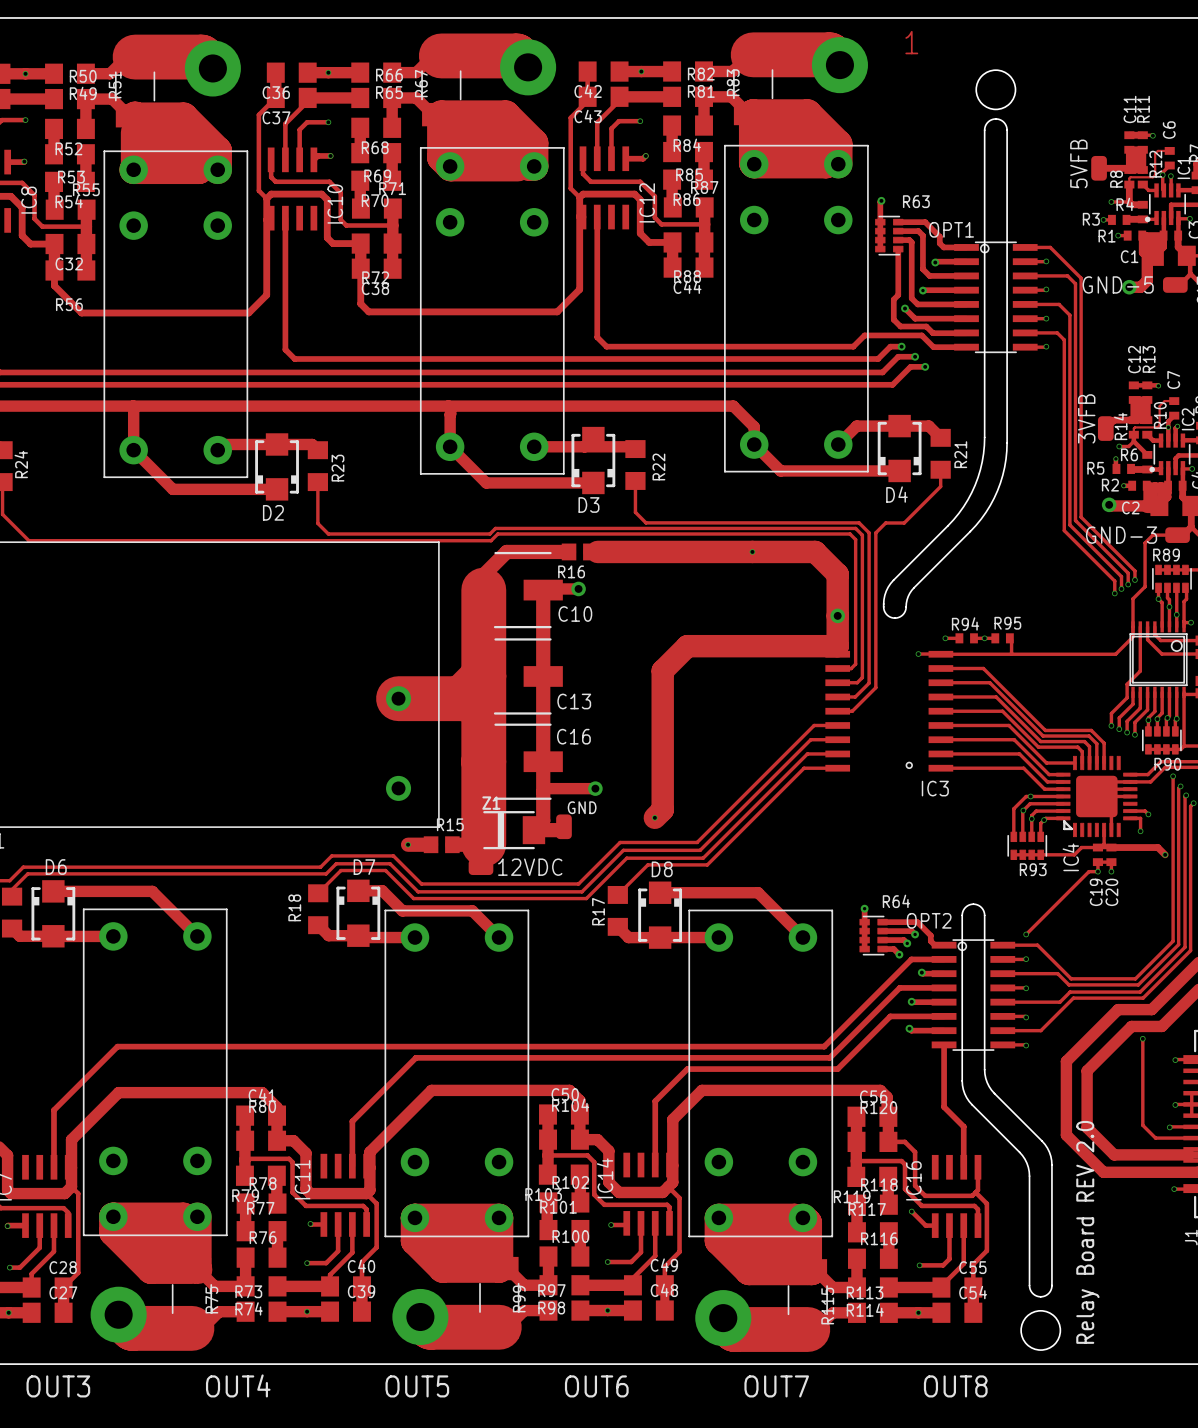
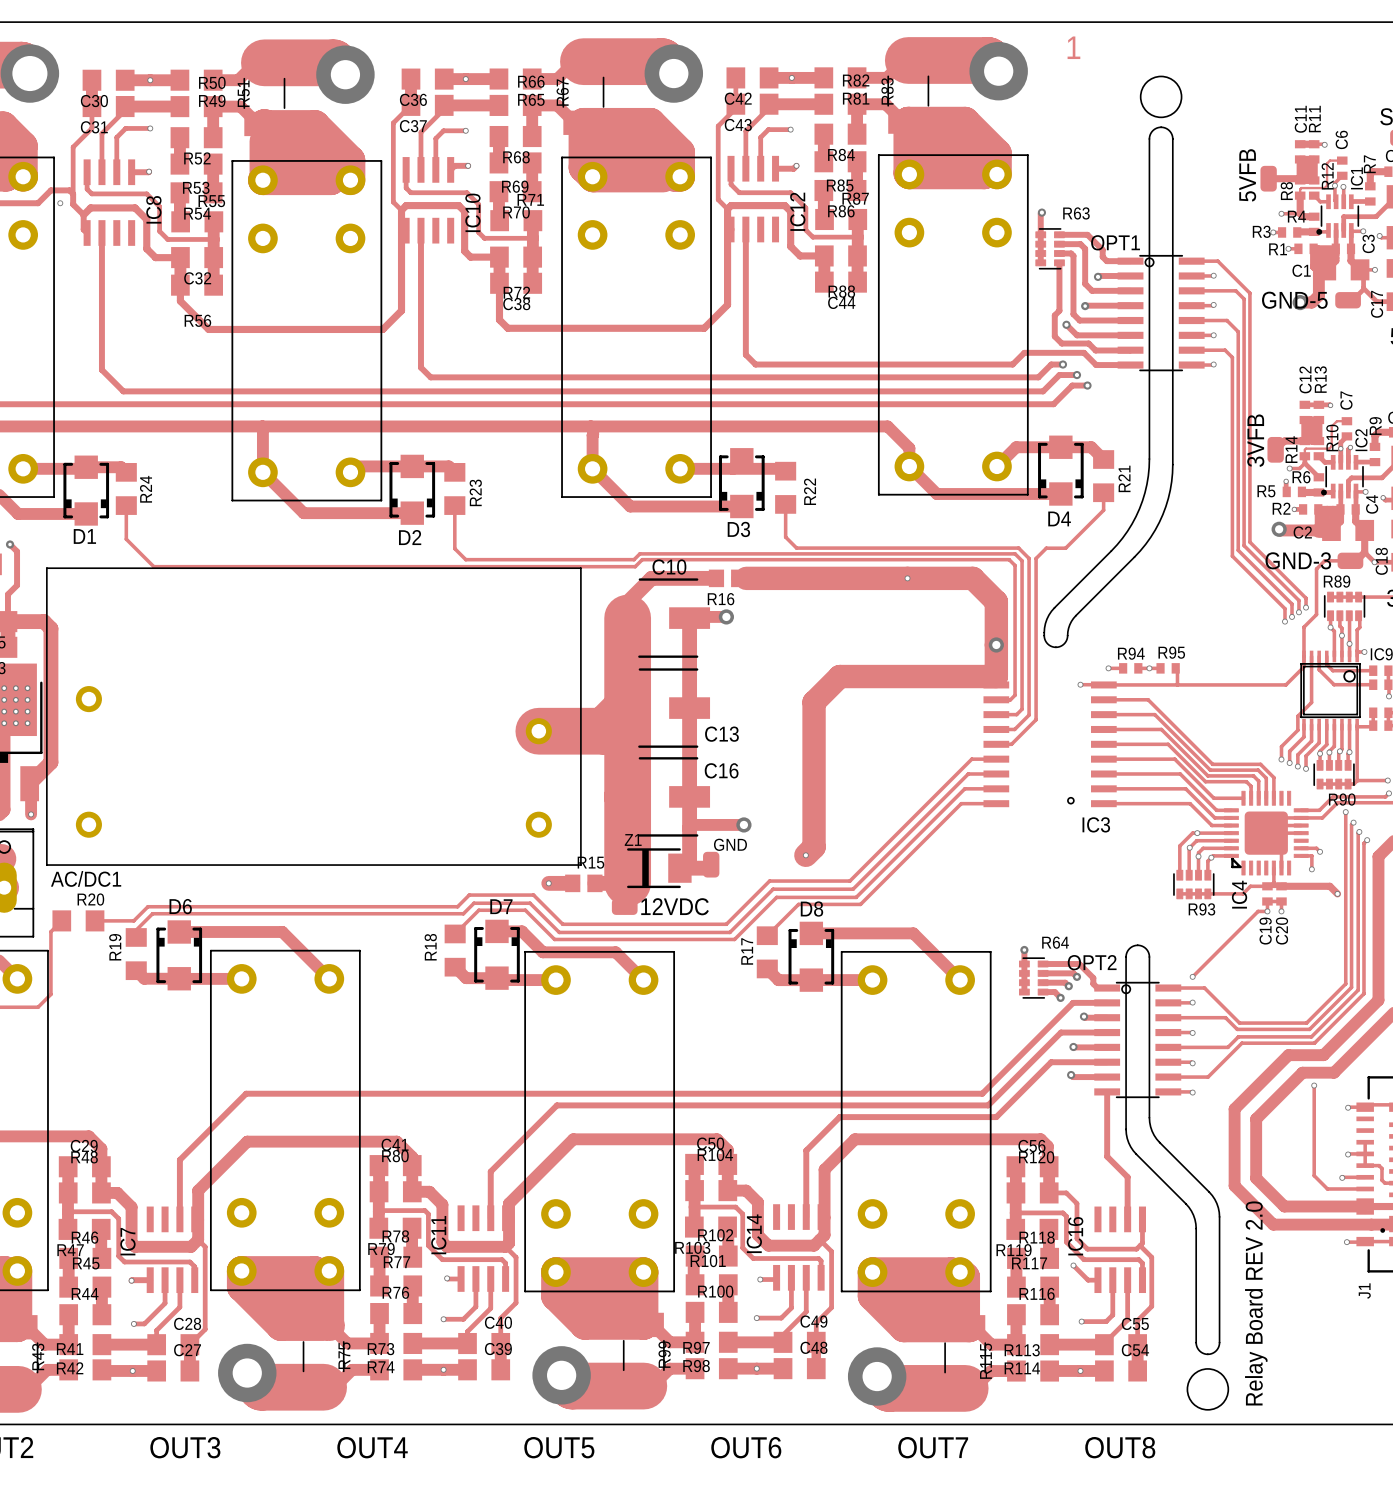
C10 name position: C10 (575, 613) -> C10 (669, 567)

